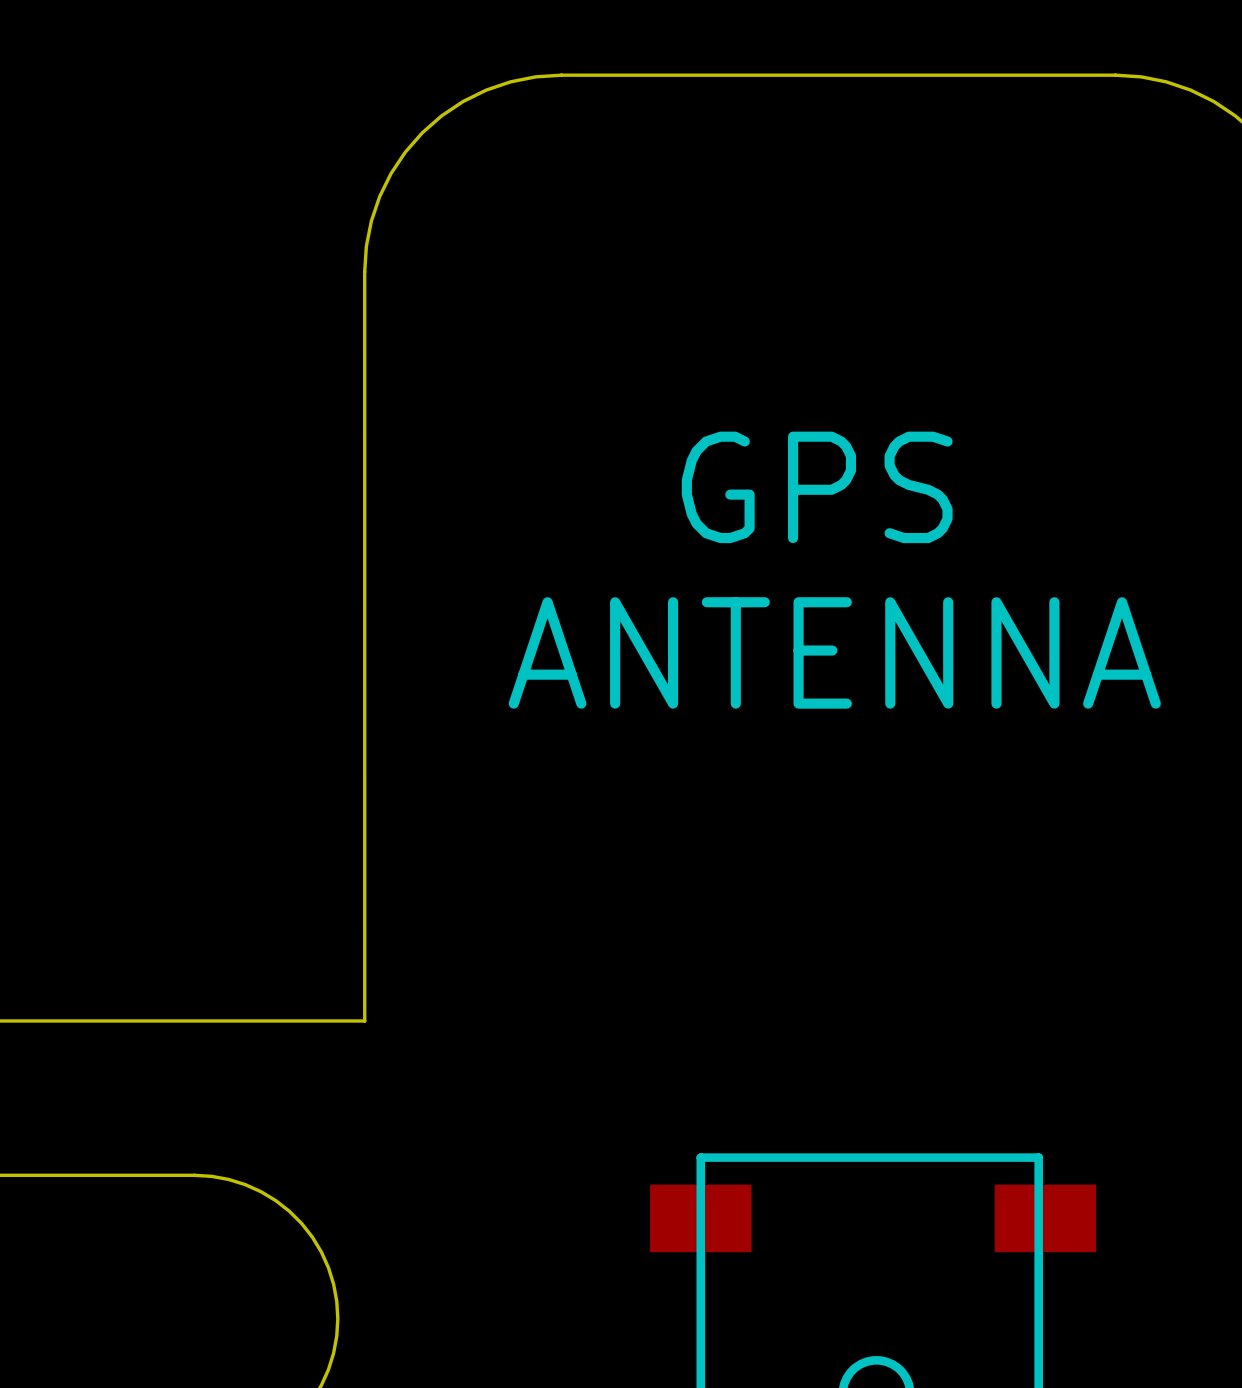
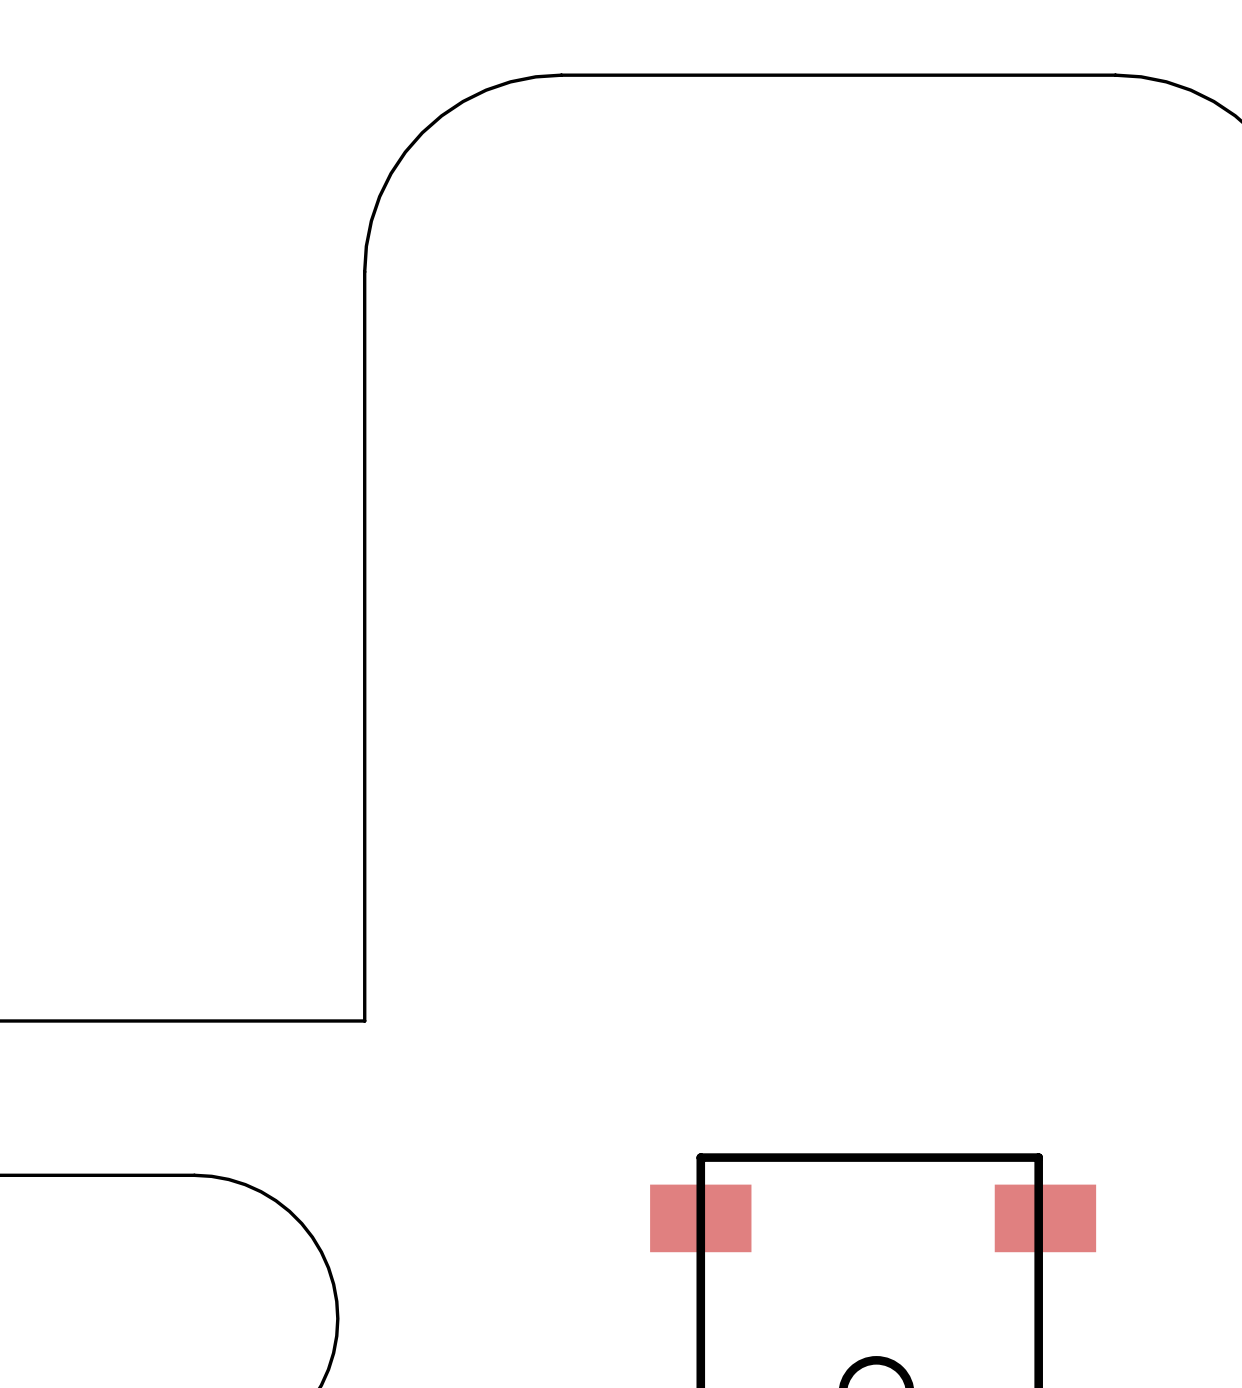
text: GPS (817, 487) -> none
text: ANTENNA (834, 652) -> none

